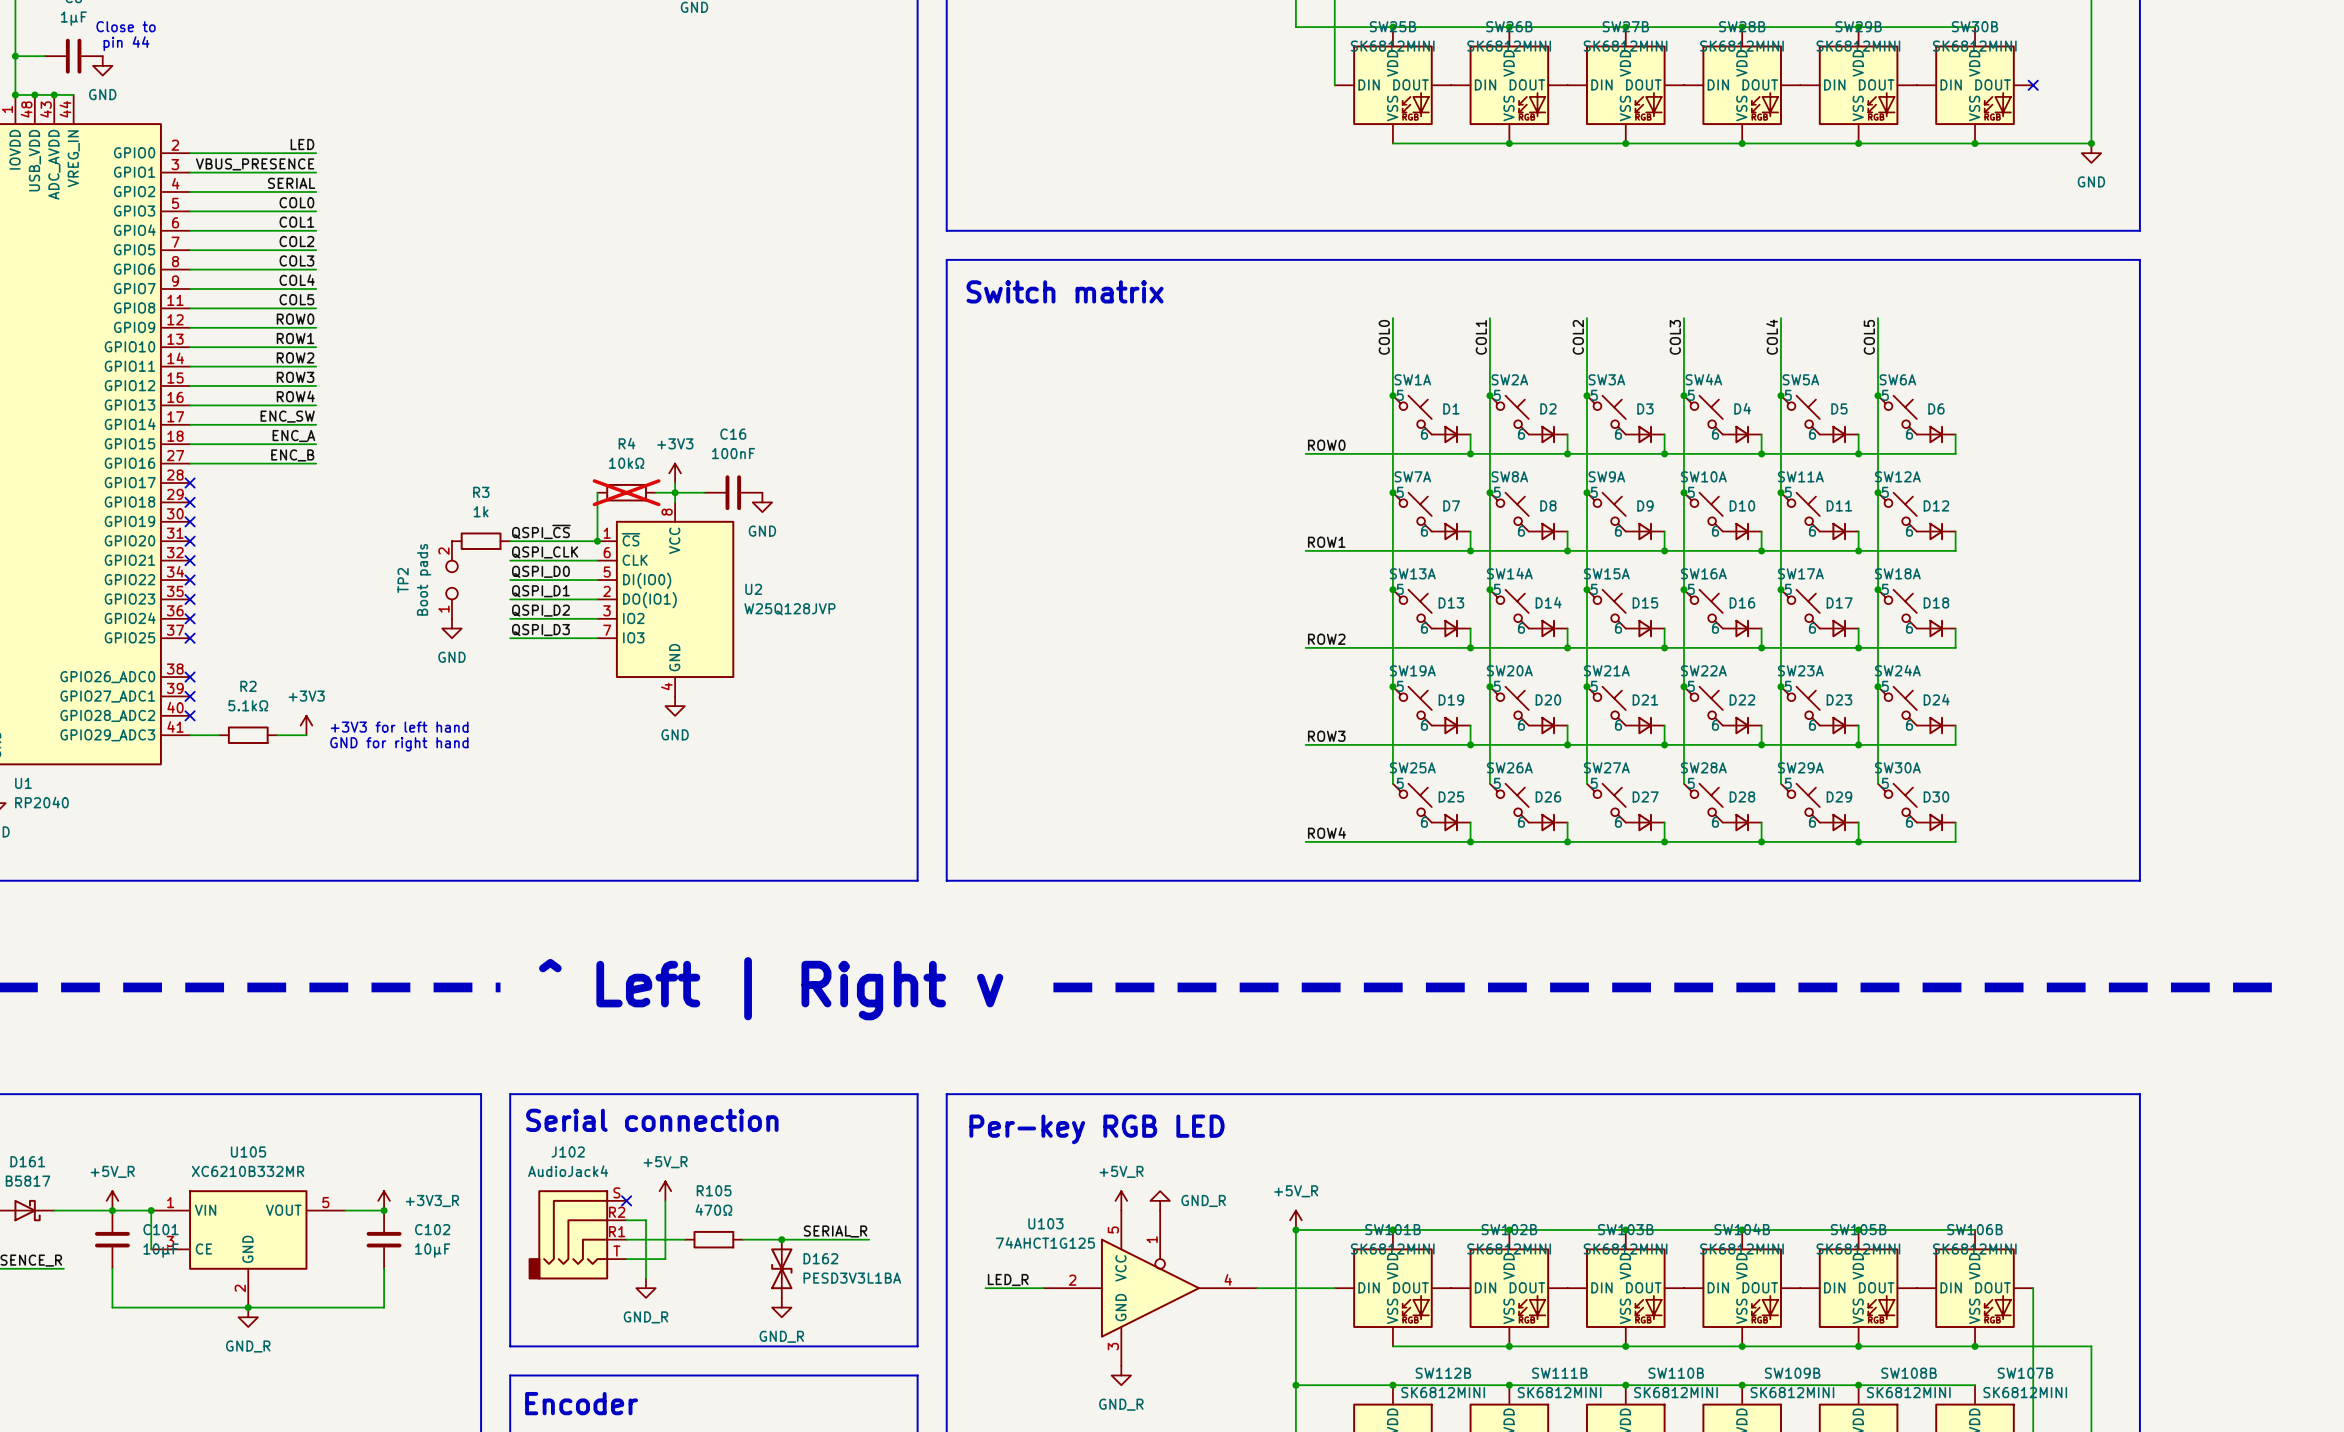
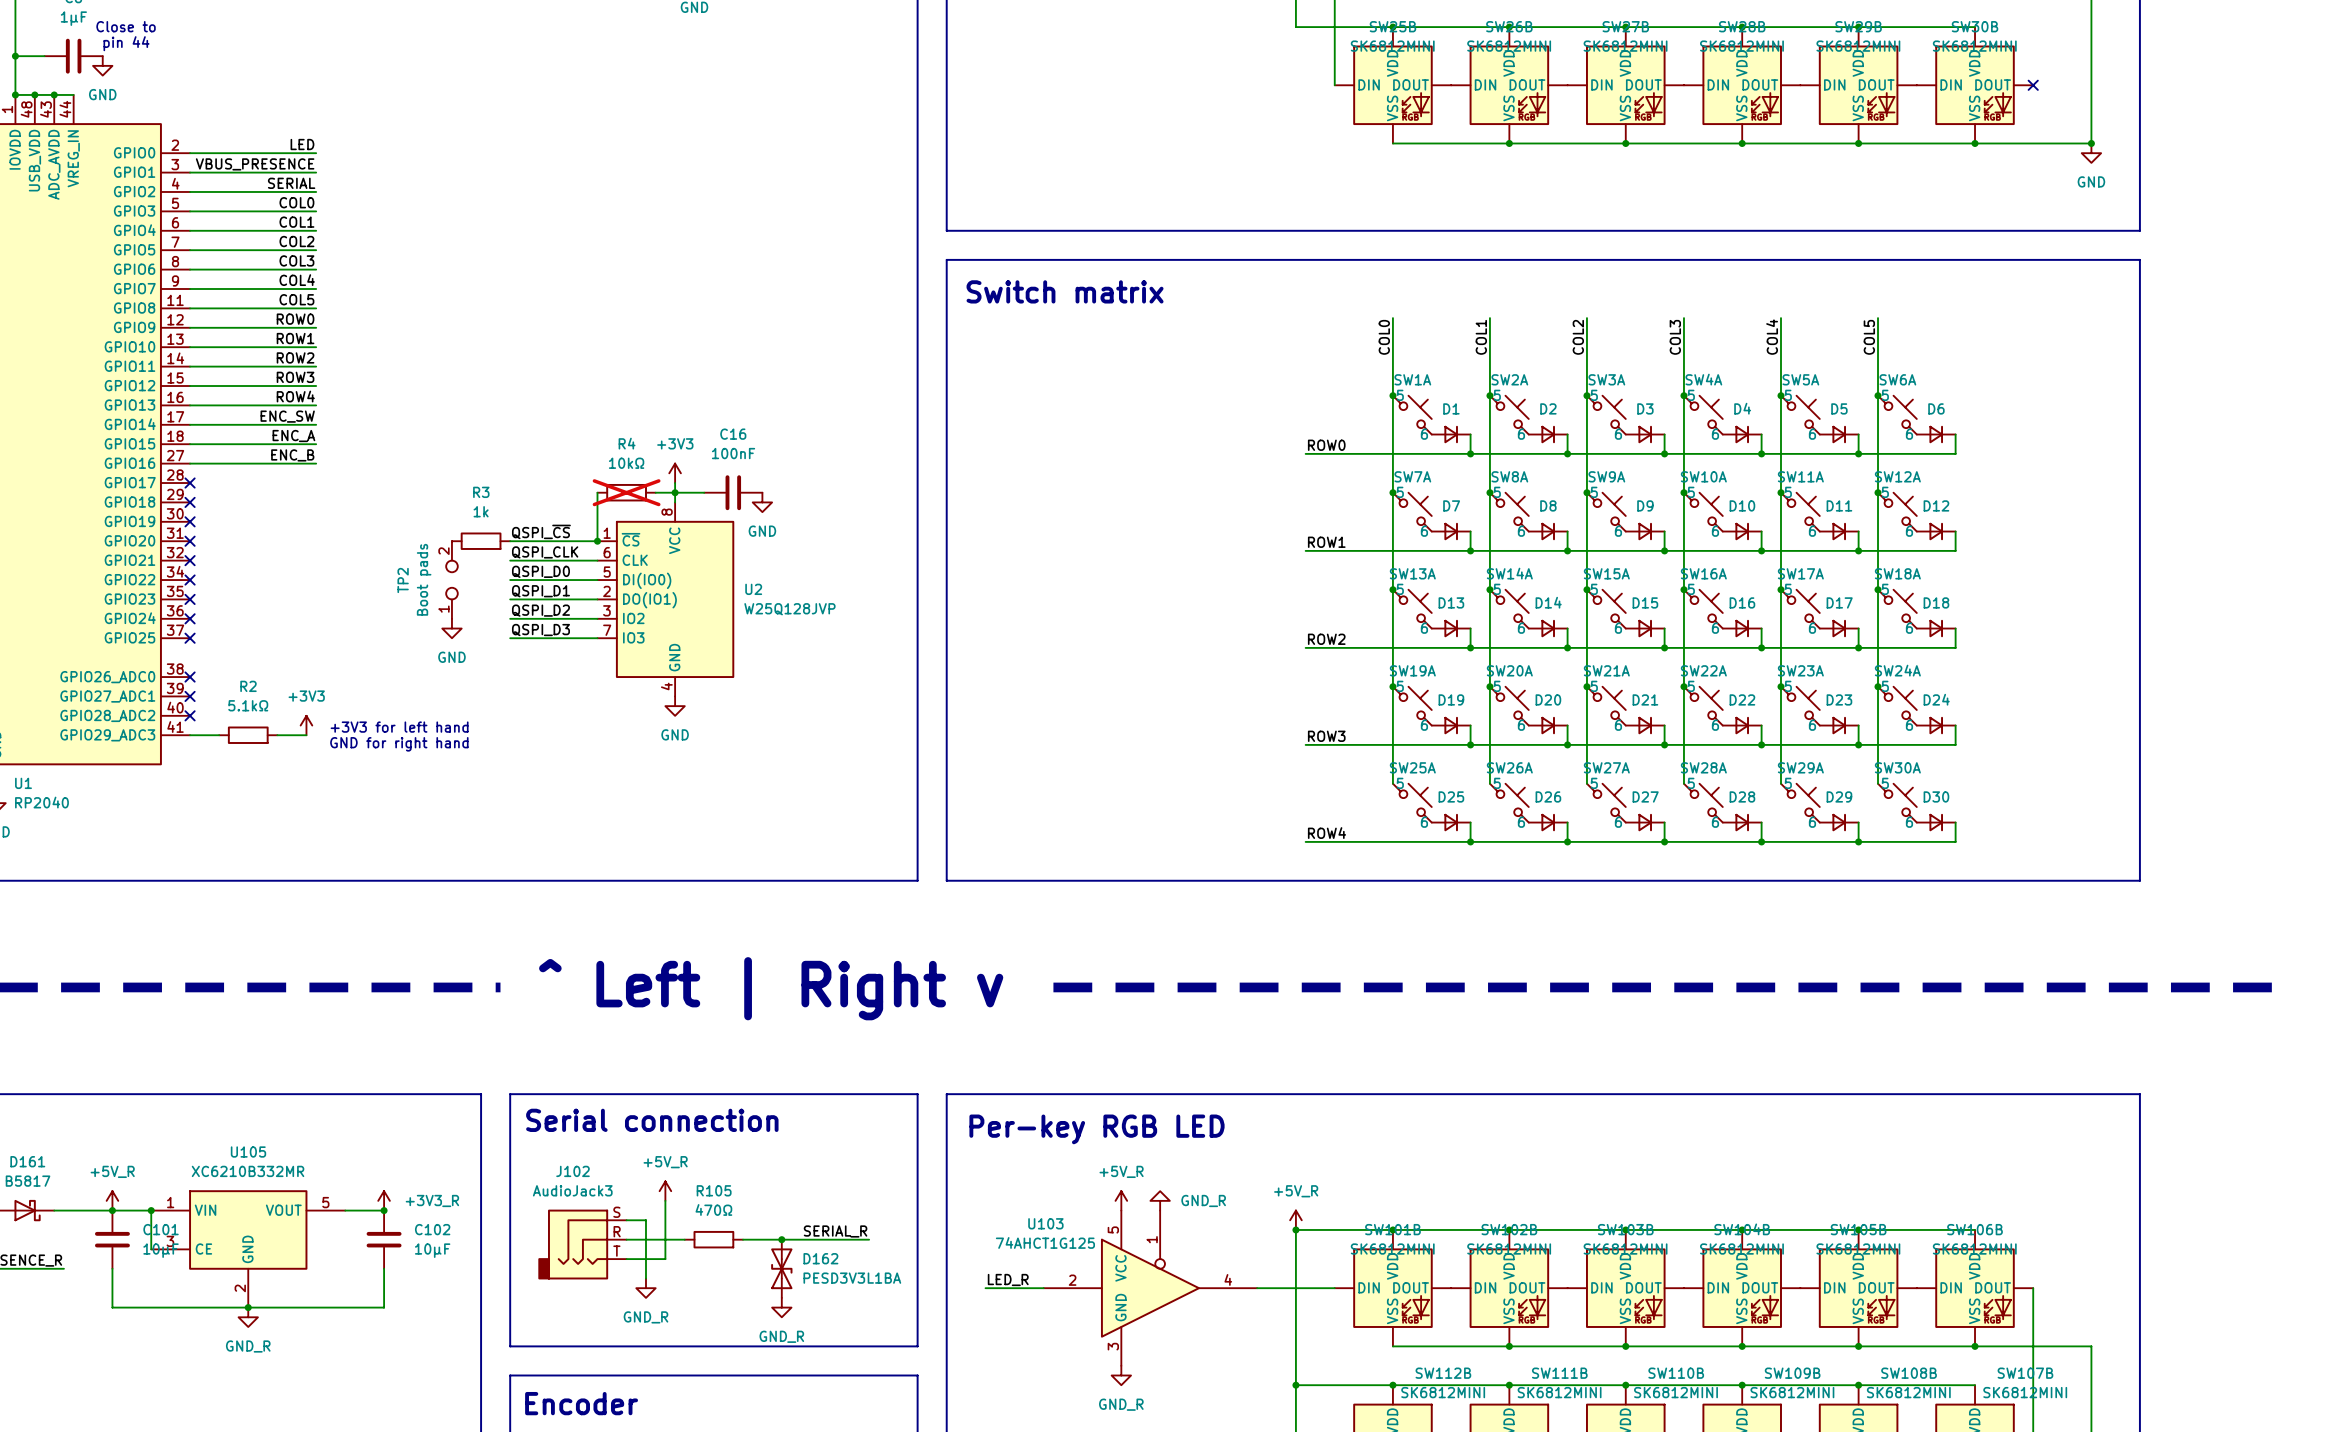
J102 value: AudioJack4 (568, 1171) -> AudioJack3 (572, 1190)
J102 symbol: [528, 1190, 627, 1280] -> [538, 1209, 627, 1280]
no-connect mark: (626, 1200) -> none

